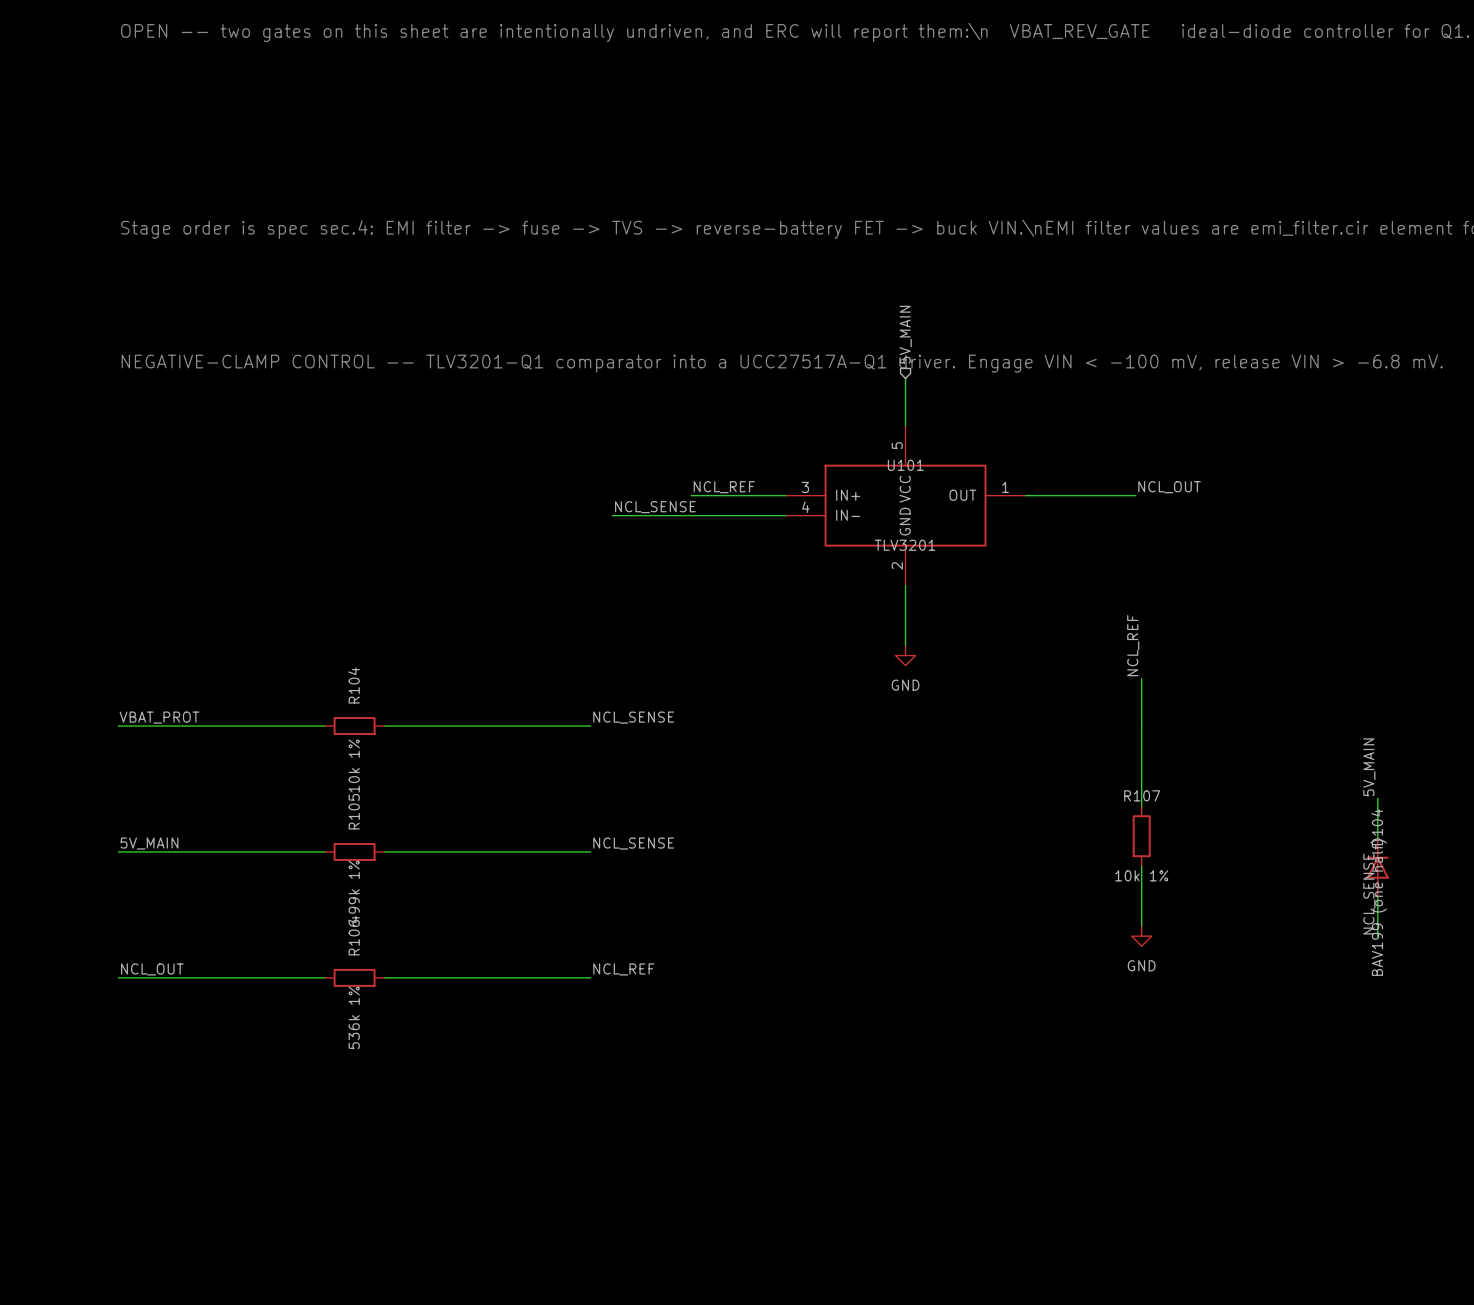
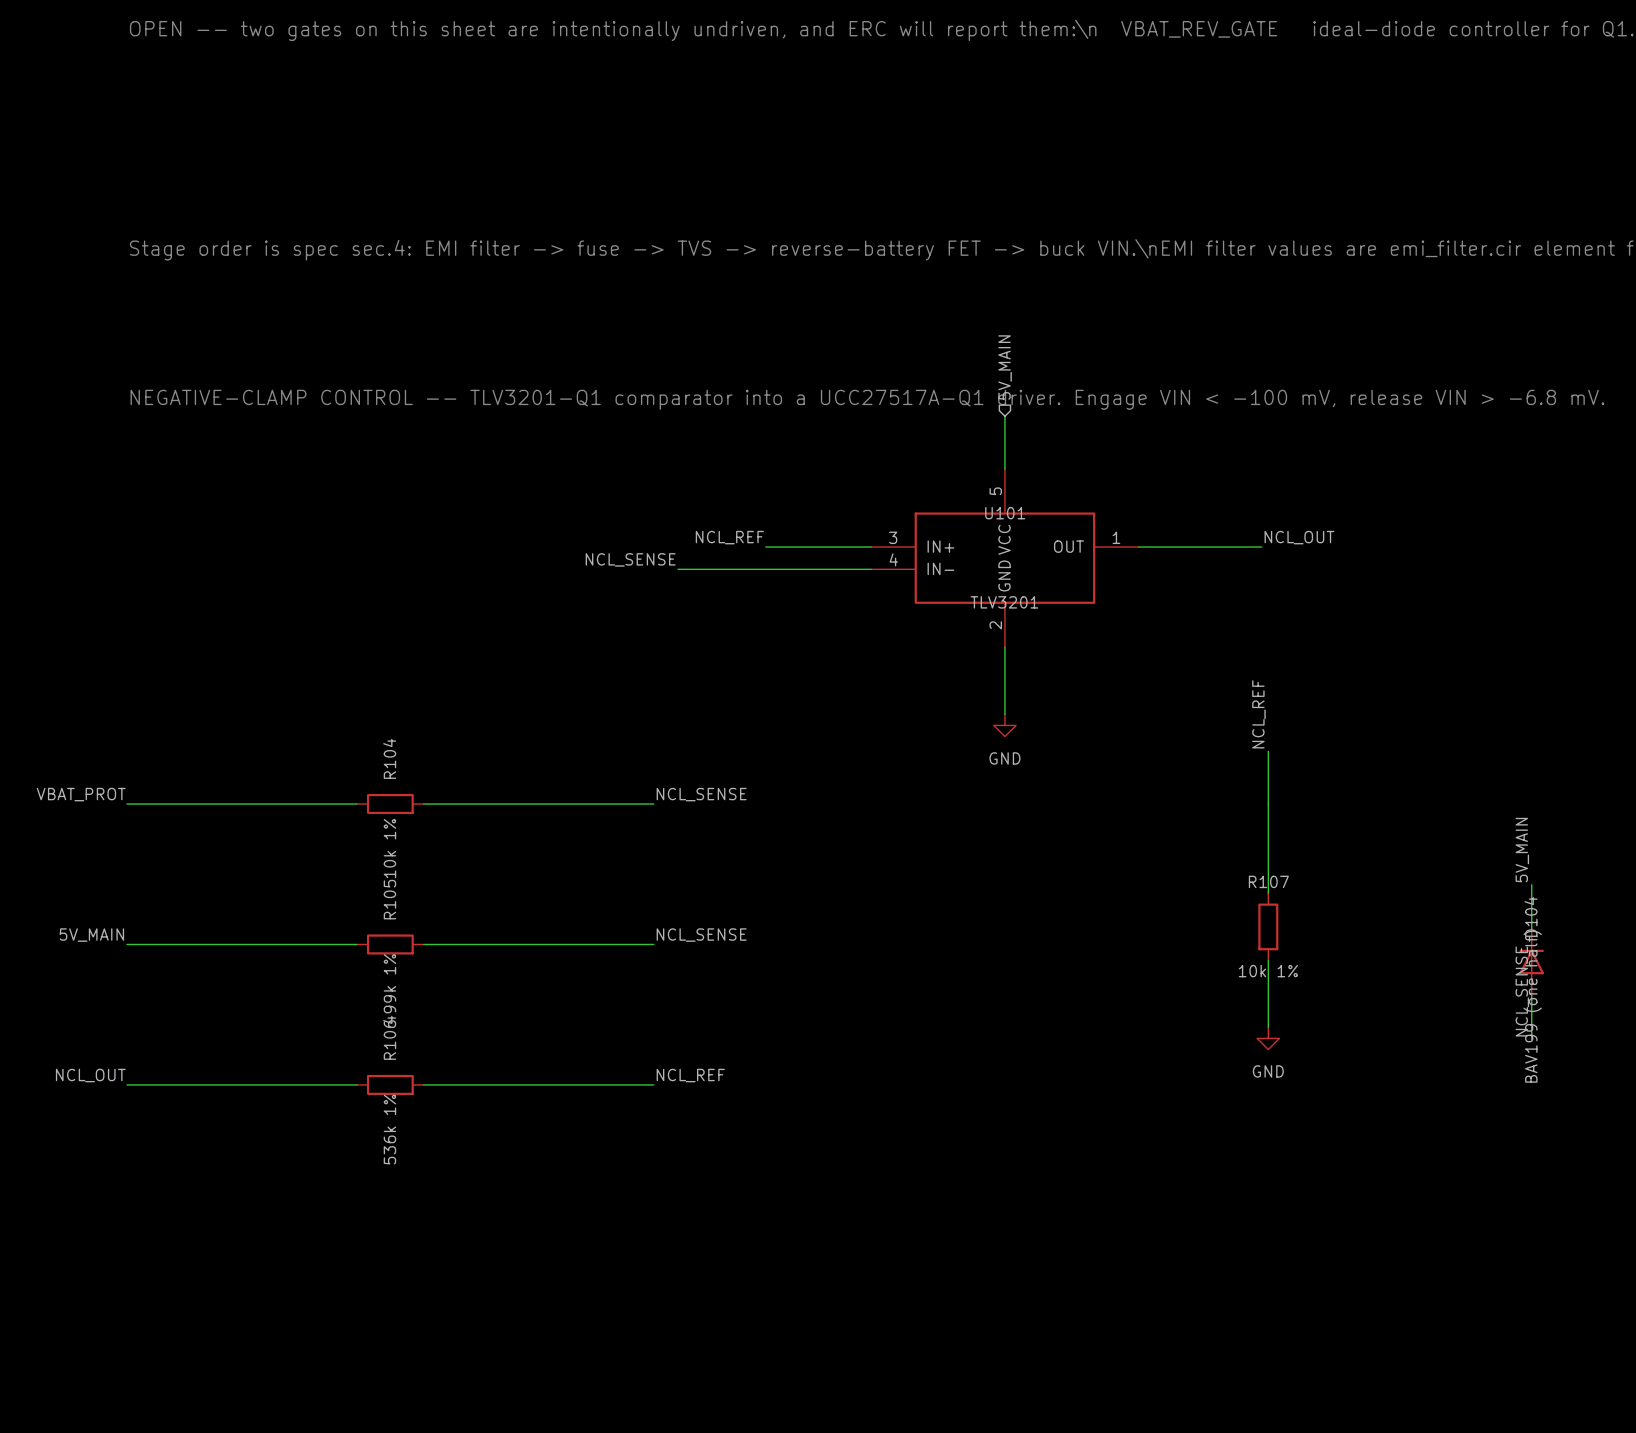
label position: NCL_REF (724, 487) -> NCL_REF (729, 537)
label position: NCL_SENSE (655, 507) -> NCL_SENSE (630, 559)
label position: VBAT_PROT (159, 717) -> VBAT_PROT (81, 794)
label position: 5V_MAIN (149, 843) -> 5V_MAIN (91, 935)
label position: NCL_OUT (152, 969) -> NCL_OUT (90, 1075)

